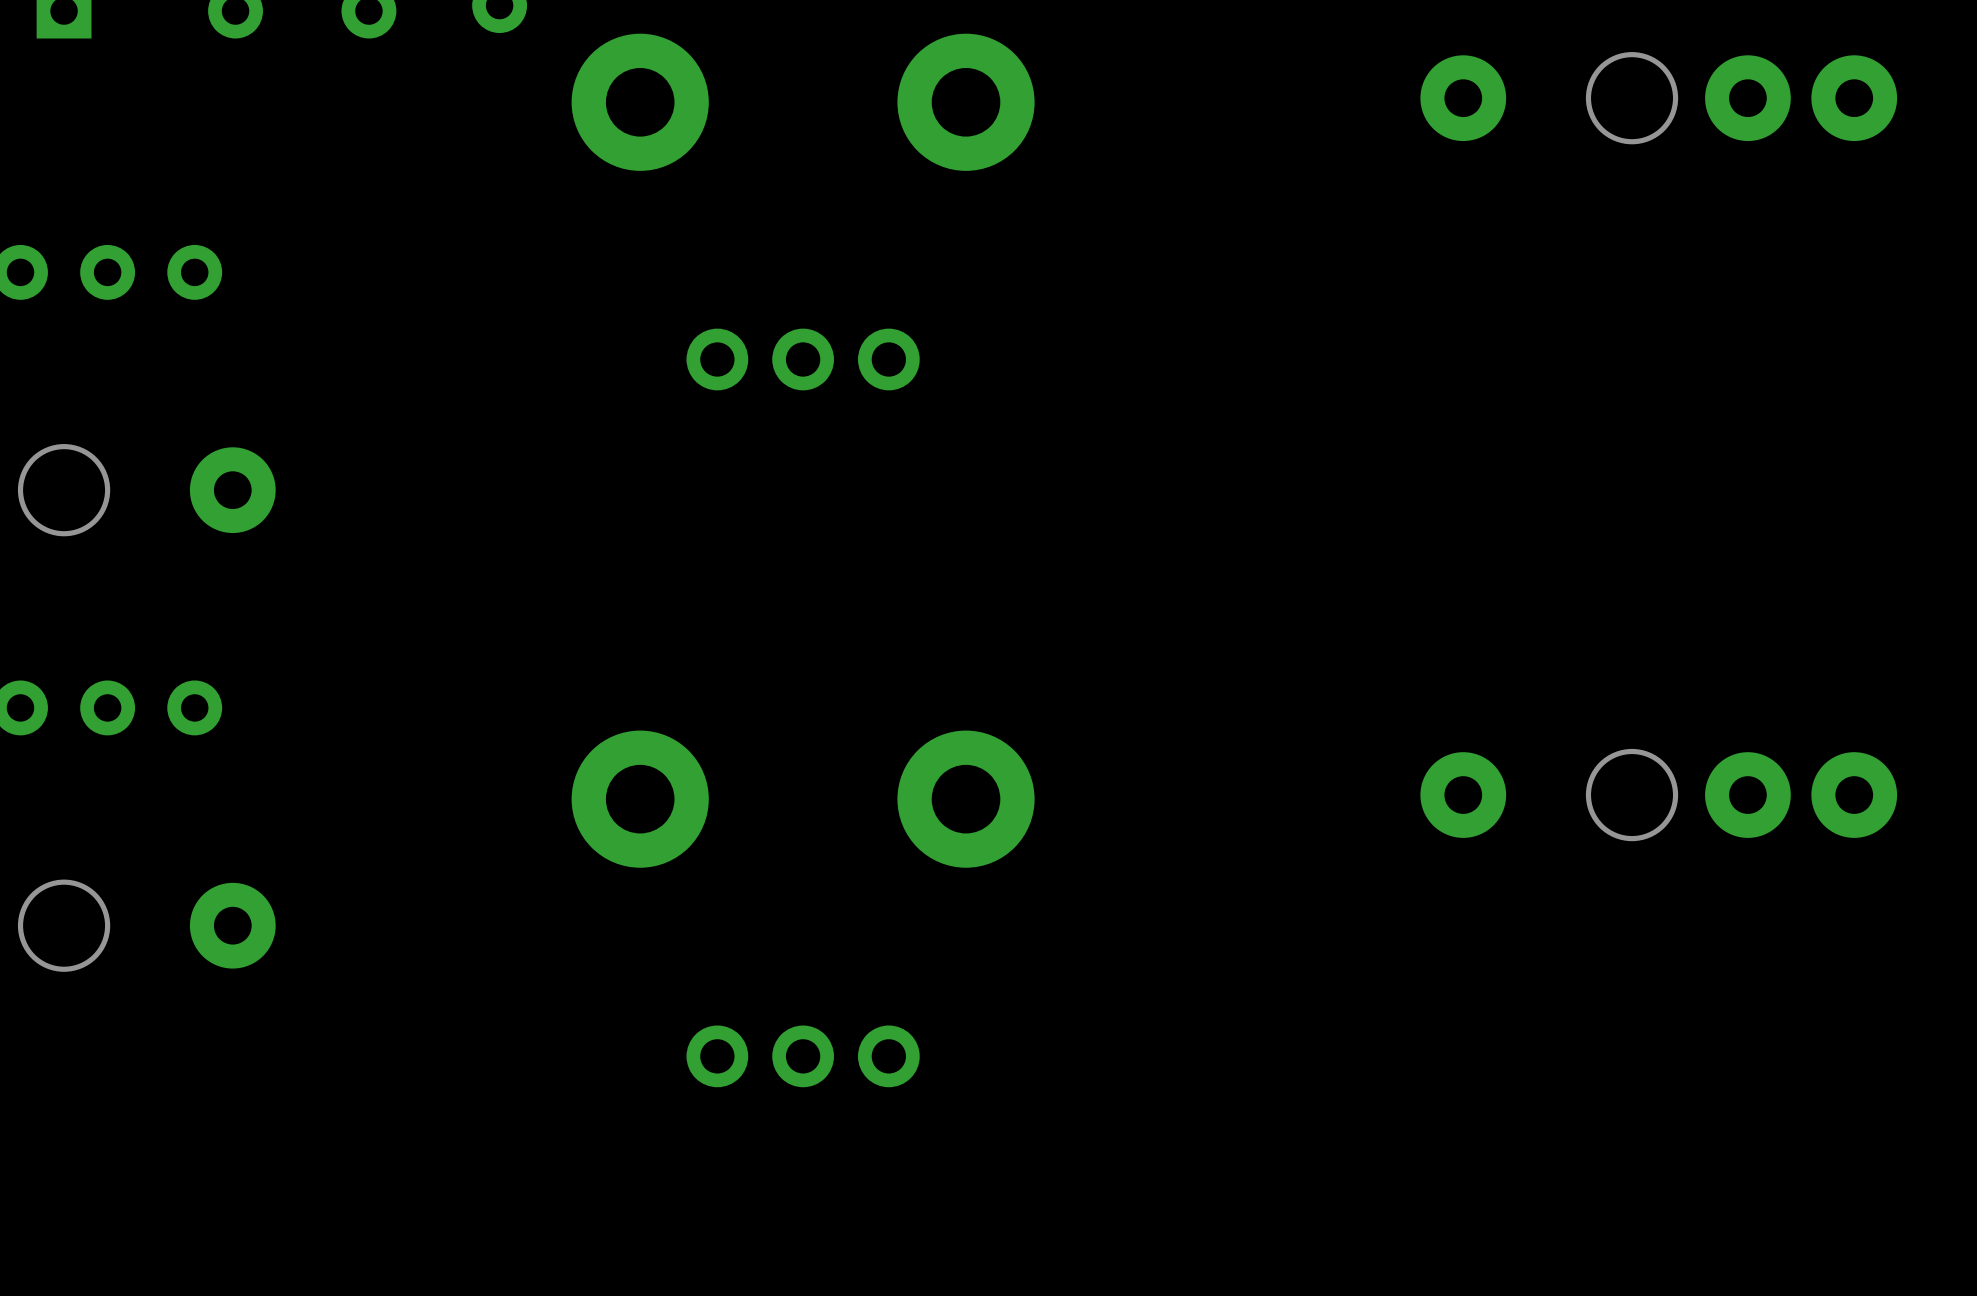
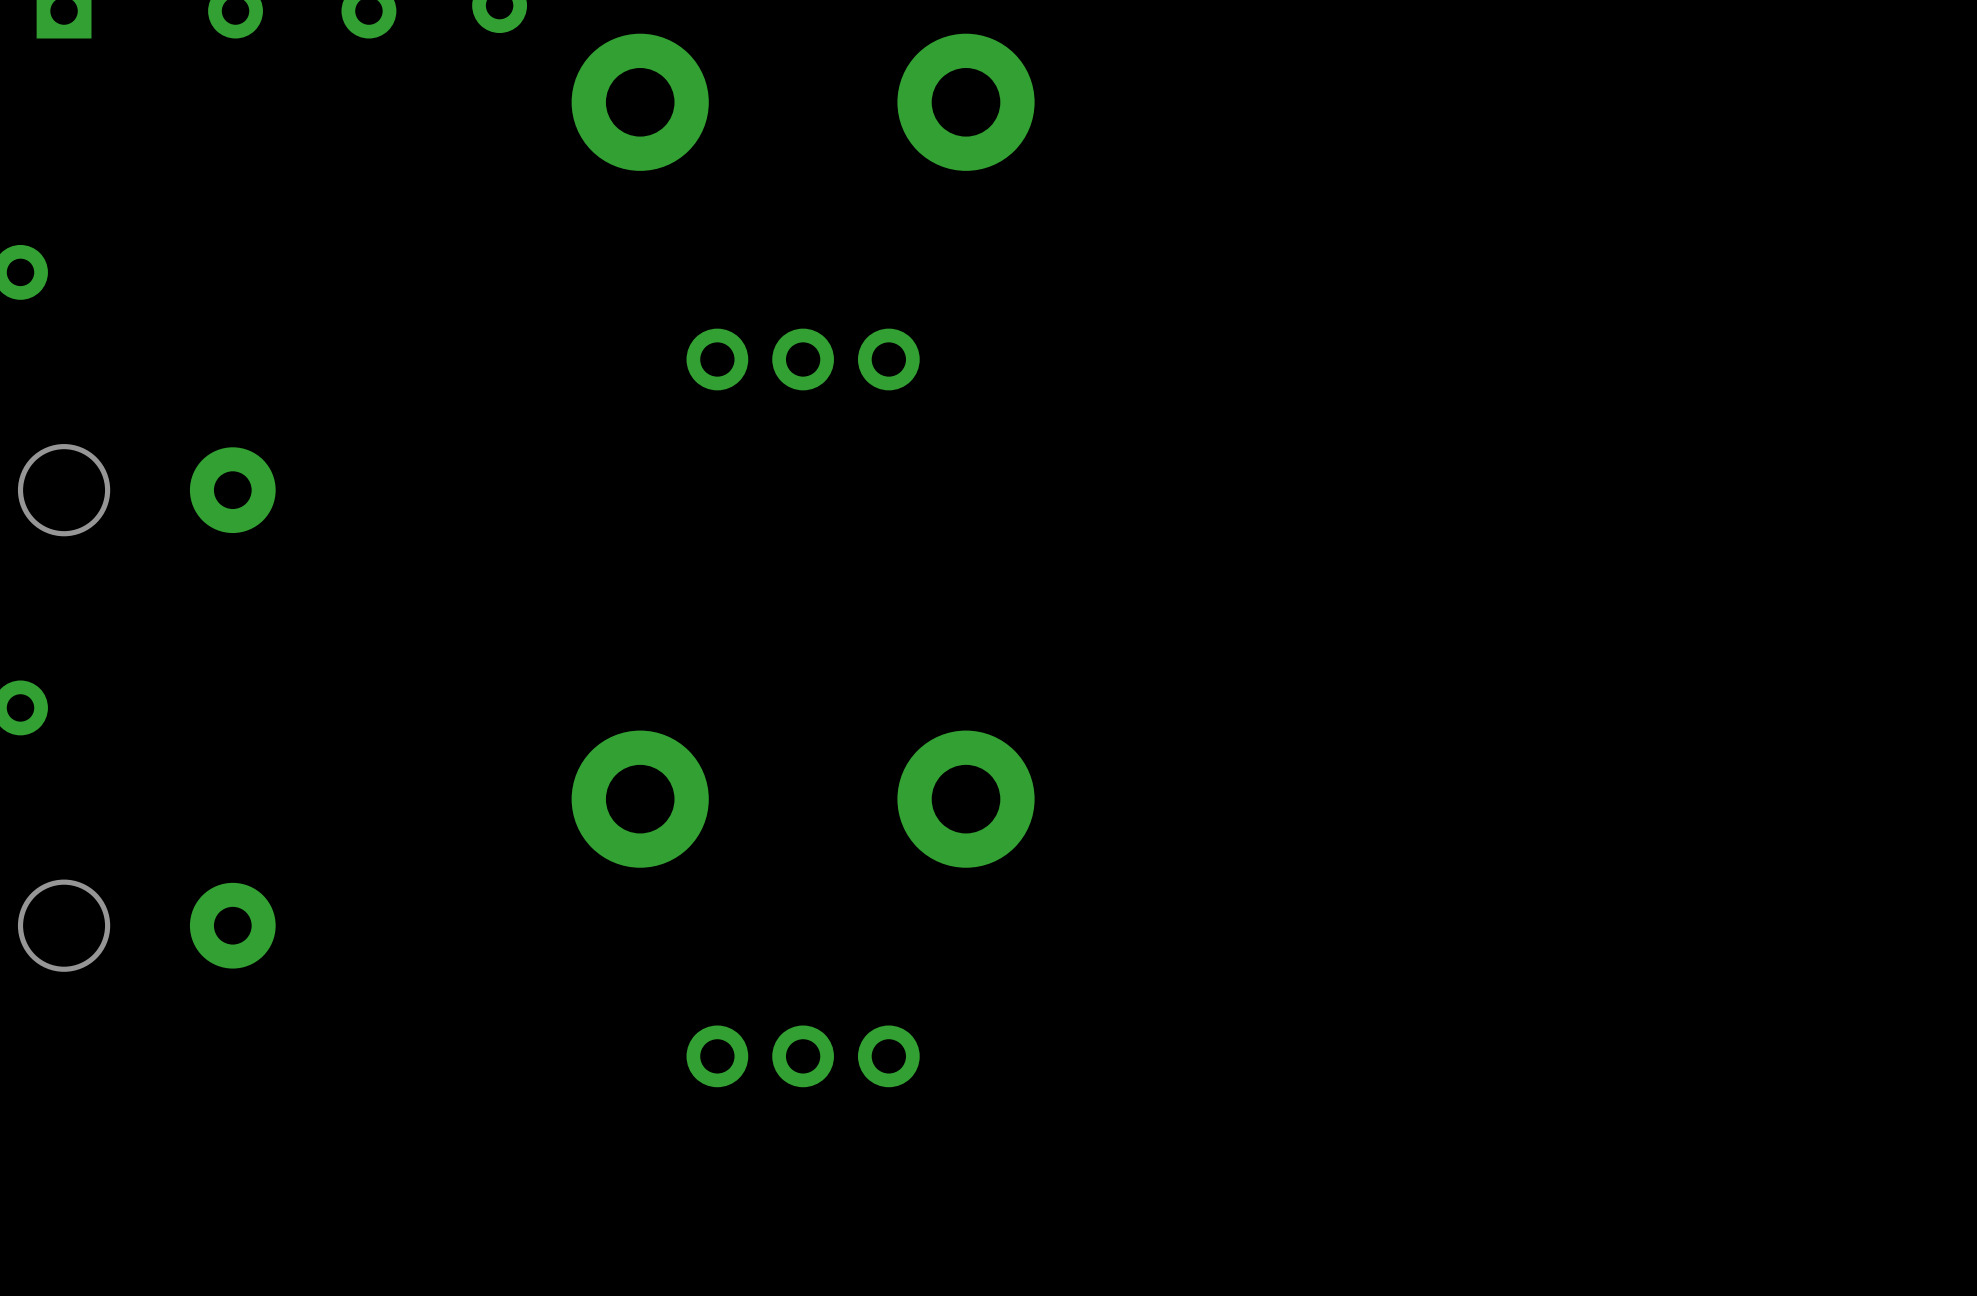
part: (1658, 98) -> none
part: (151, 272) -> none
part: (151, 707) -> none
part: (1658, 795) -> none

